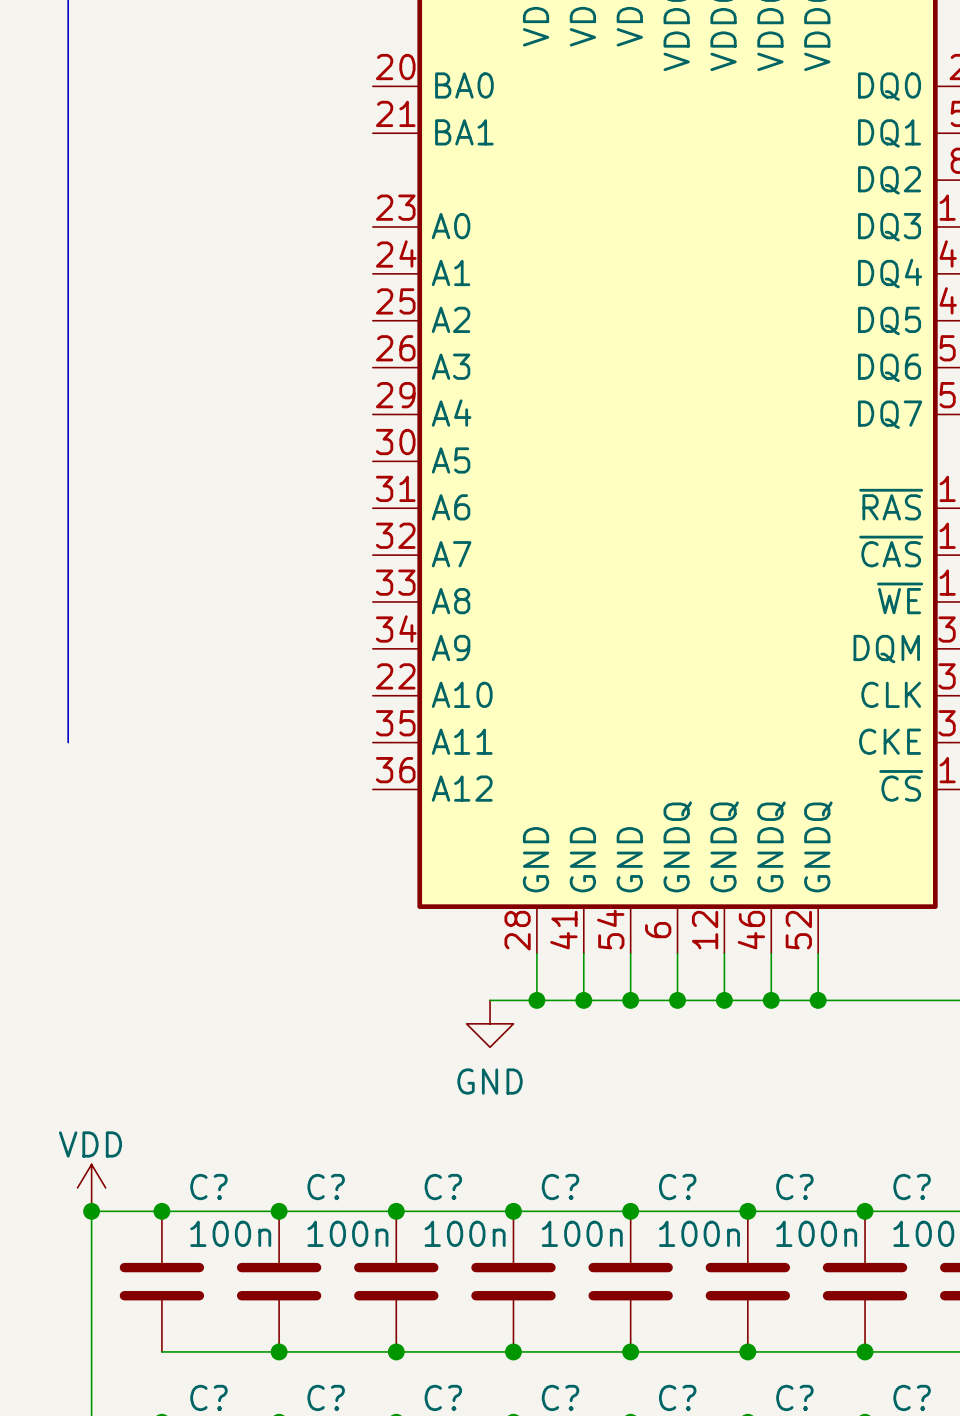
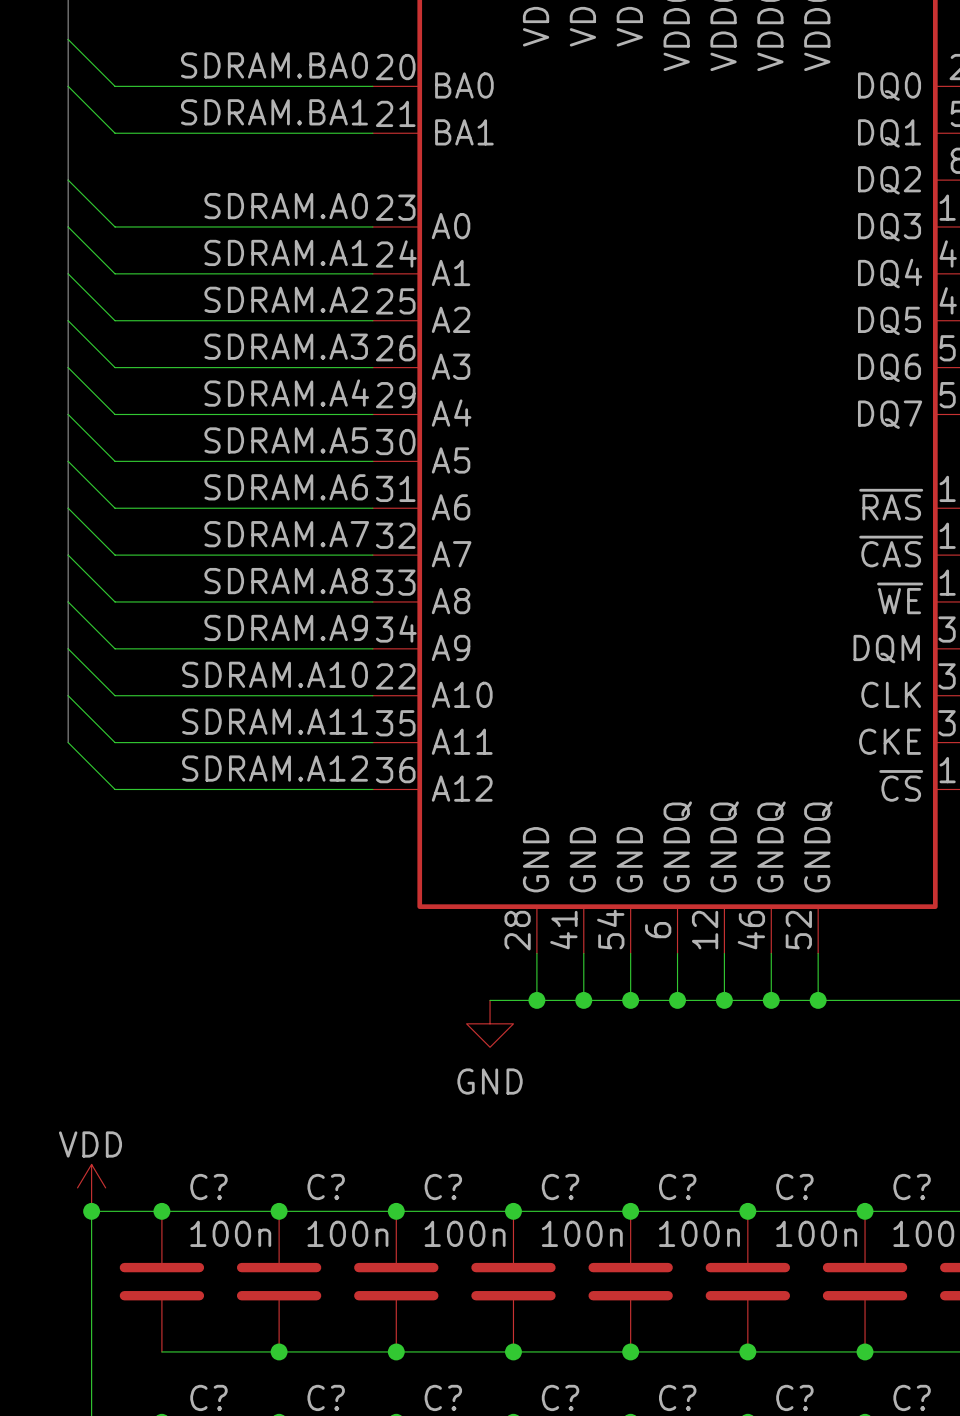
wire: none -> (68, 39) (115, 86) (372, 86)
label: none -> SDRAM.BA0 (274, 65)
wire: none -> (68, 86) (115, 133) (372, 133)
label: none -> SDRAM.BA1 (274, 112)
wire: none -> (68, 180) (115, 226) (372, 226)
label: none -> SDRAM.A0 (286, 206)
wire: none -> (68, 226) (115, 273) (372, 273)
label: none -> SDRAM.A1 (286, 252)
wire: none -> (68, 273) (115, 320) (372, 320)
label: none -> SDRAM.A2 (286, 299)
wire: none -> (68, 320) (115, 367) (372, 367)
label: none -> SDRAM.A3 (286, 346)
wire: none -> (68, 367) (115, 414) (372, 414)
label: none -> SDRAM.A4 (286, 393)
wire: none -> (68, 414) (115, 461) (372, 461)
label: none -> SDRAM.A5 (286, 440)
wire: none -> (68, 461) (115, 508) (372, 508)
label: none -> SDRAM.A6 (286, 487)
wire: none -> (68, 508) (115, 555) (372, 555)
label: none -> SDRAM.A7 (286, 534)
wire: none -> (68, 555) (115, 601) (372, 601)
label: none -> SDRAM.A8 (286, 581)
wire: none -> (68, 601) (115, 648) (372, 648)
label: none -> SDRAM.A9 (286, 627)
wire: none -> (68, 648) (115, 695) (372, 695)
label: none -> SDRAM.A10 (275, 674)
wire: none -> (68, 695) (115, 742) (372, 742)
label: none -> SDRAM.A11 (275, 721)
wire: none -> (68, 742) (115, 789) (372, 789)
label: none -> SDRAM.A12 (275, 768)

